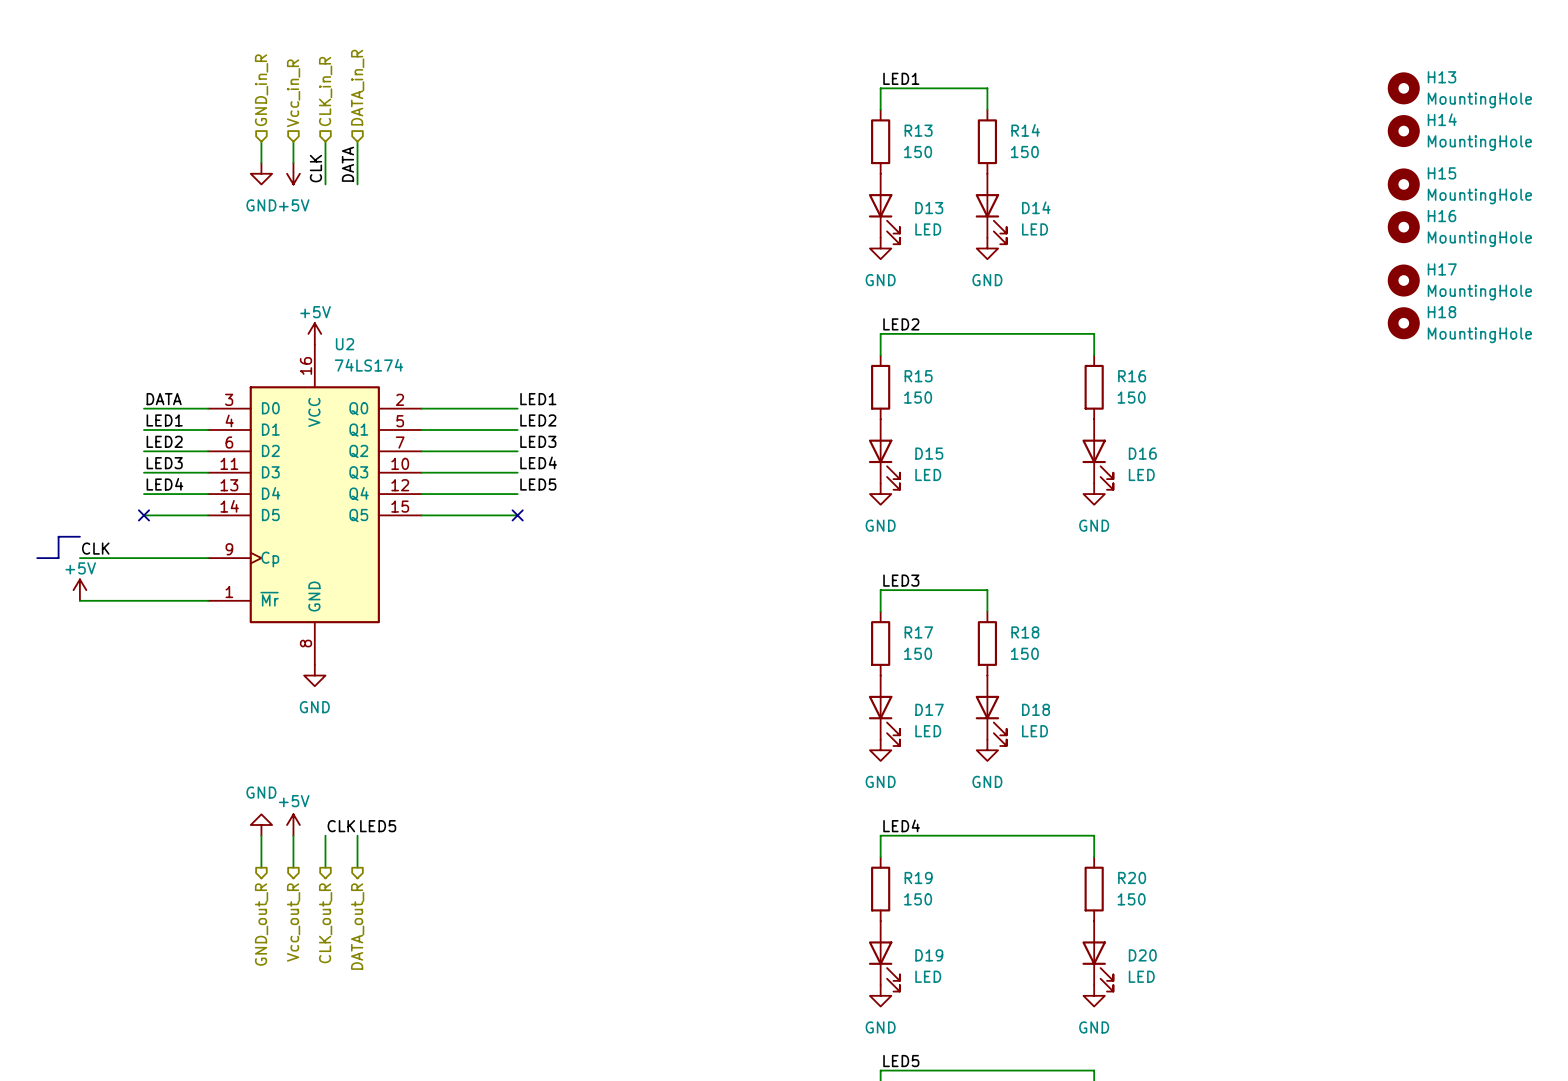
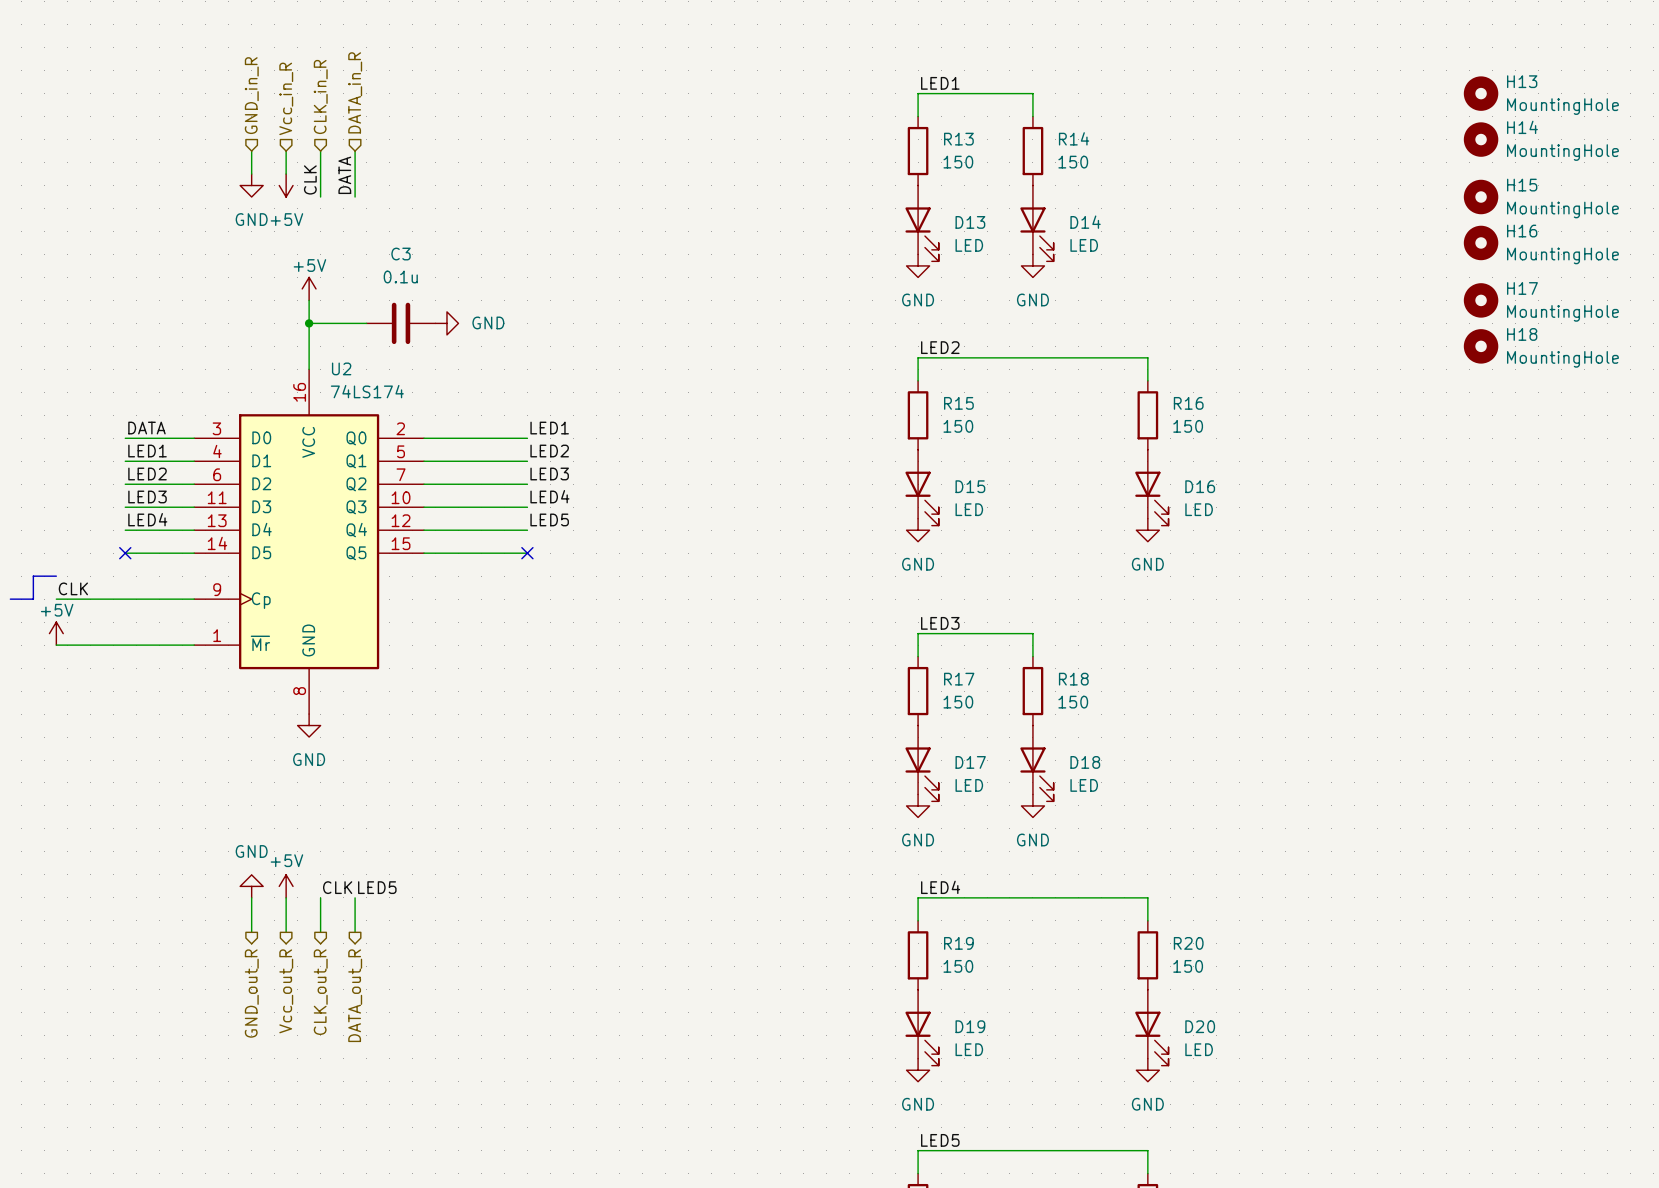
wire: none -> (309, 300) (309, 369)
wire: none -> (309, 323) (366, 323)
junction: none -> (309, 323)
C3: none -> 0.1u (401, 323)
power symbol: none -> GND (446, 323)
power symbol position: +5V (314, 333) -> +5V (309, 288)

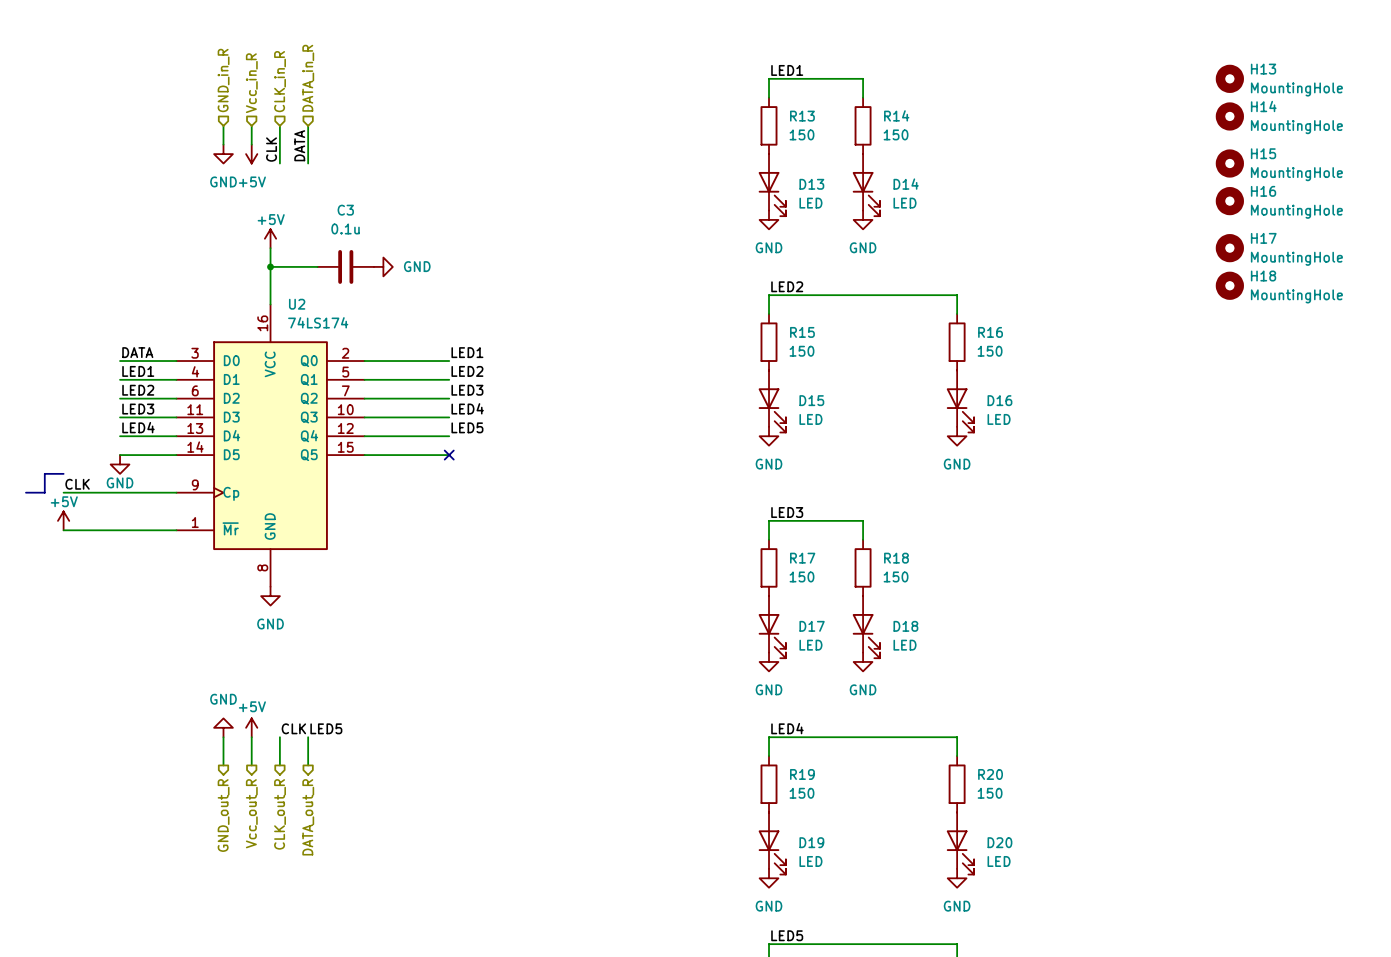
no-connect mark: (125, 553) -> none
power symbol: none -> GND (120, 464)

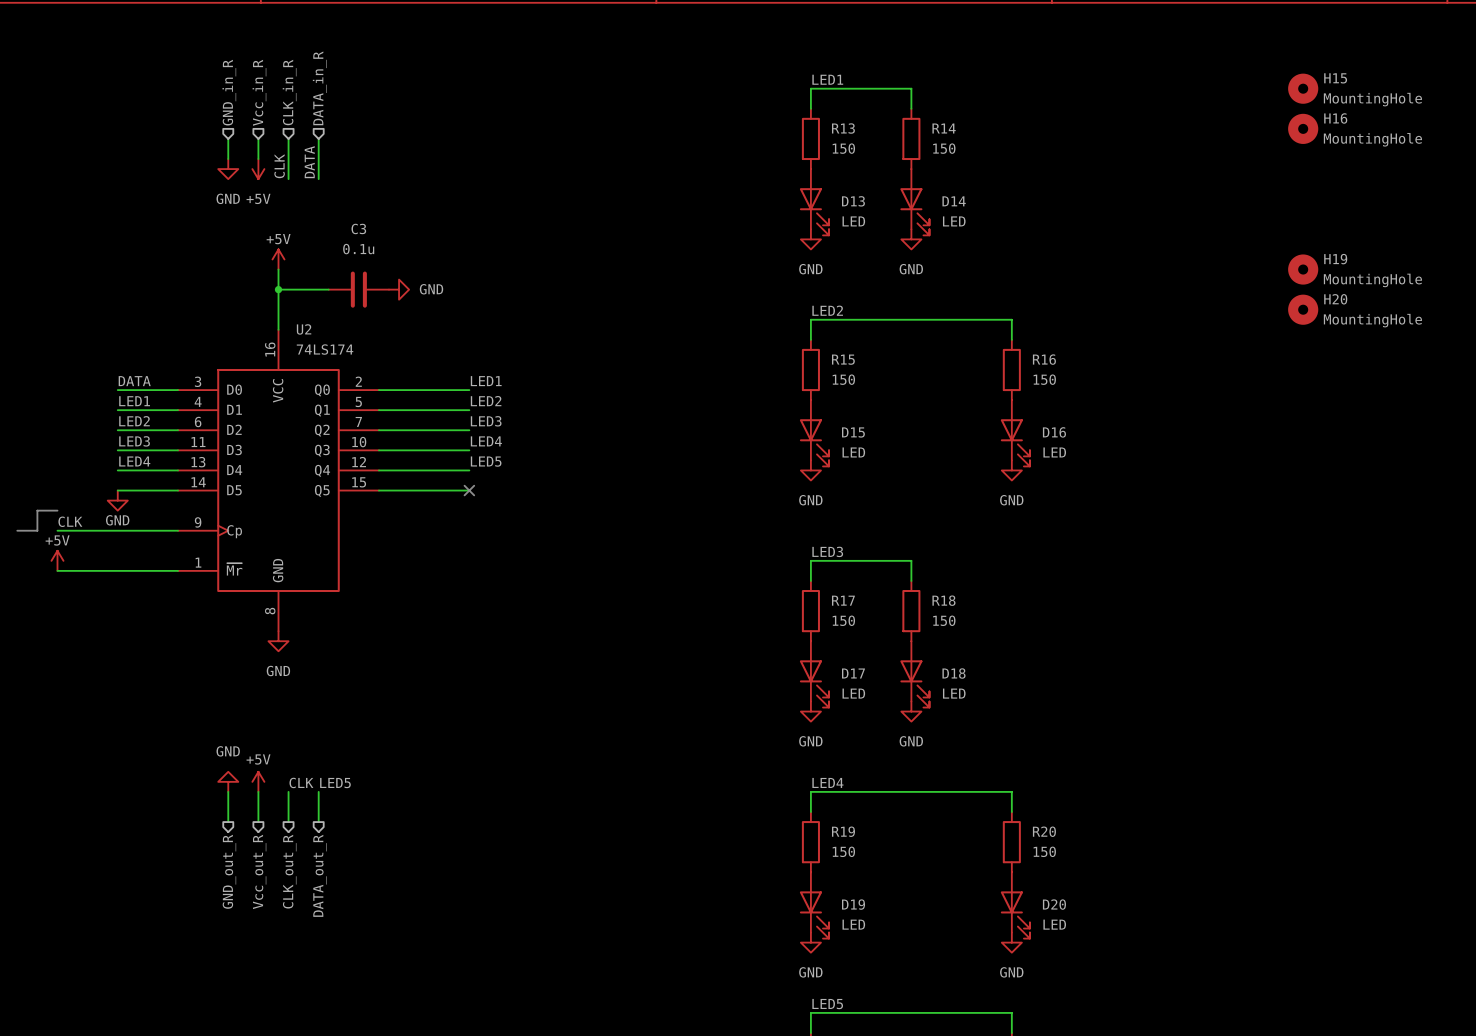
H13 name: H13 (1263, 69) -> H15 (1335, 78)
H14 name: H14 (1263, 106) -> H16 (1335, 118)
H15: MountingHole (1229, 163) -> none
H16: MountingHole (1229, 201) -> none
H17 name: H17 (1263, 238) -> H19 (1335, 259)
H18 name: H18 (1263, 276) -> H20 (1335, 299)

